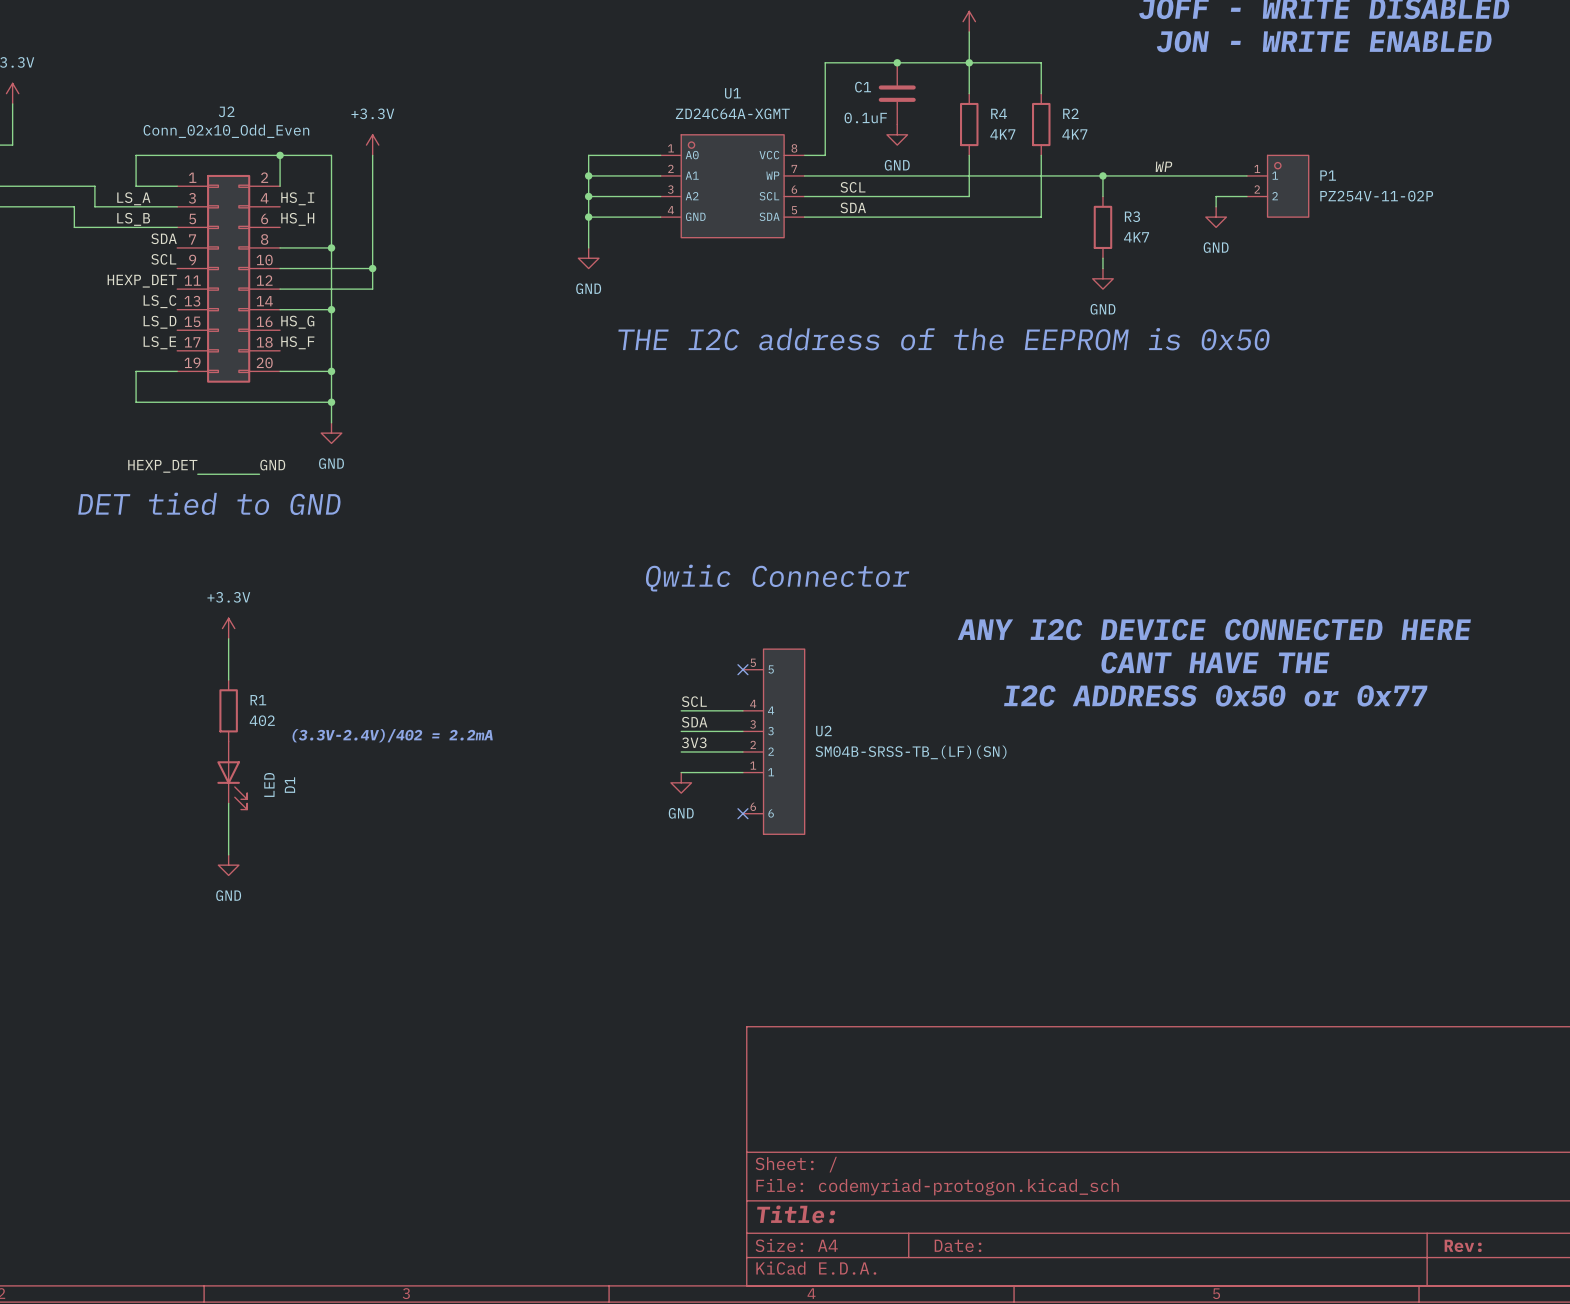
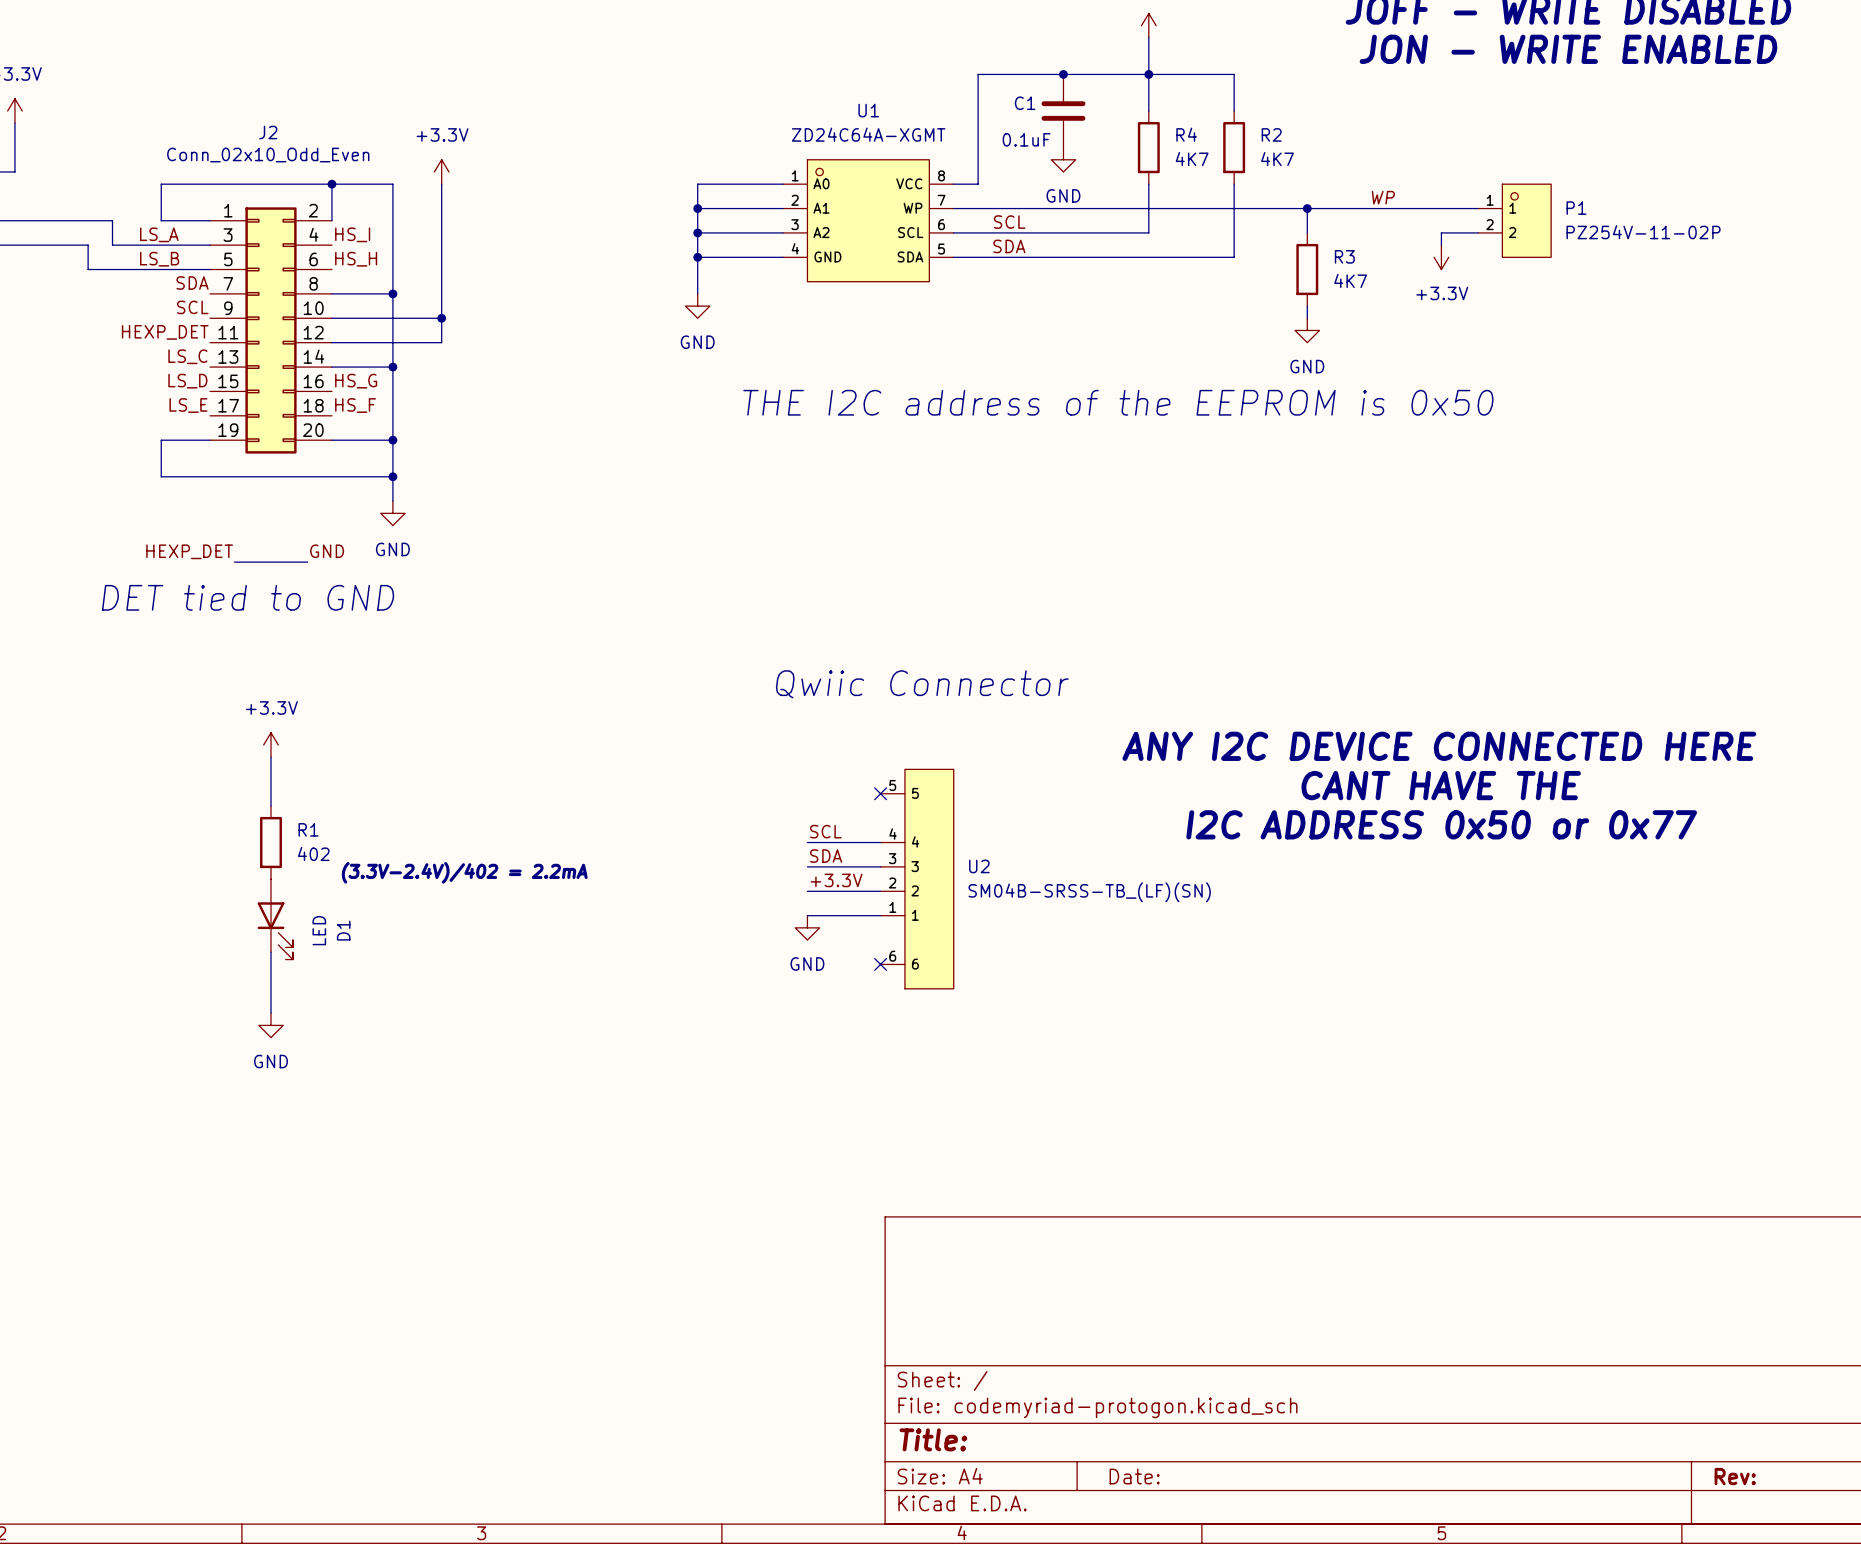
power symbol: GND (1216, 217) -> +3.3V (1441, 257)
label: 3V3 (694, 742) -> +3.3V (836, 880)

